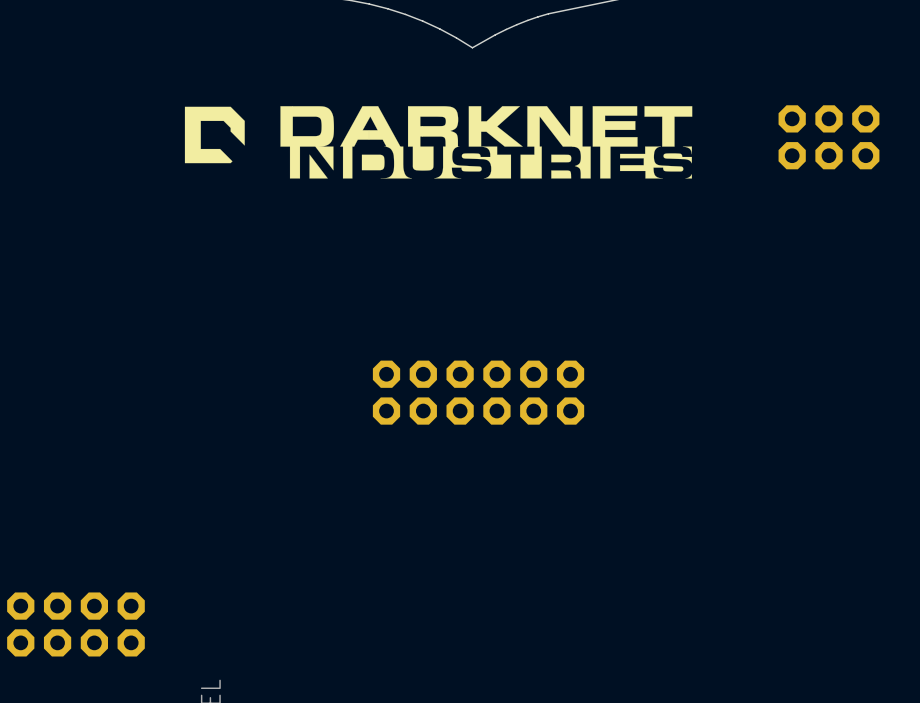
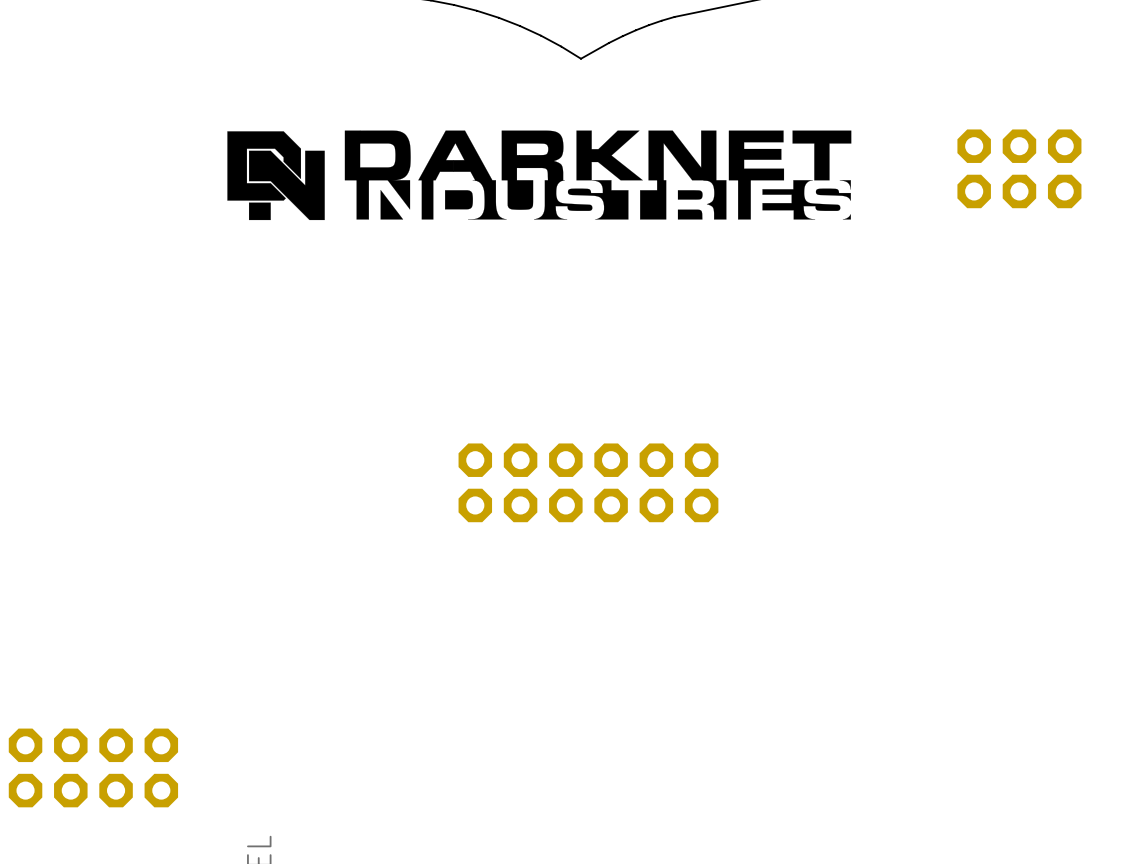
drawing shape: [184, 106, 693, 179] -> [227, 130, 852, 221]

